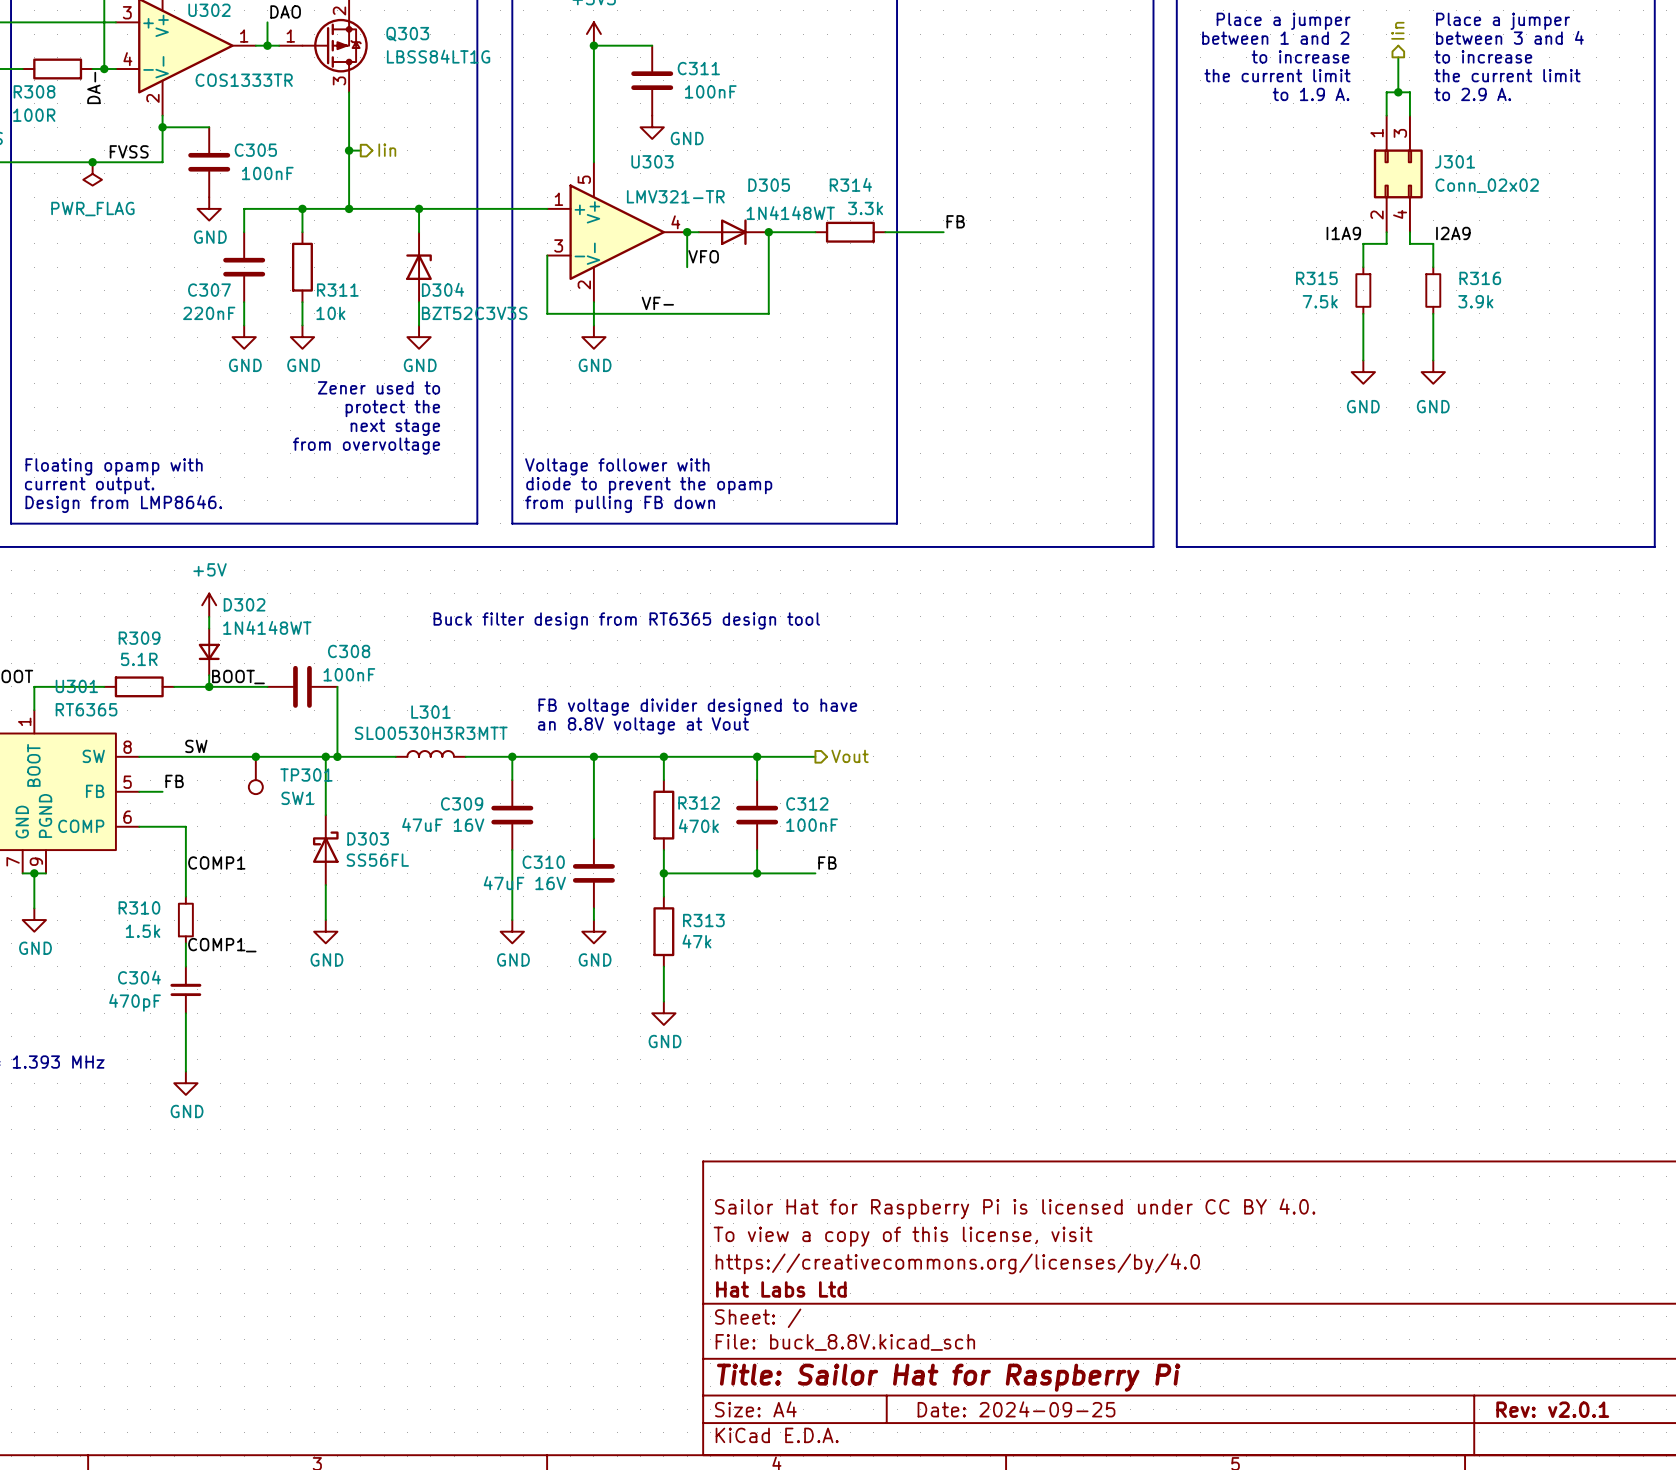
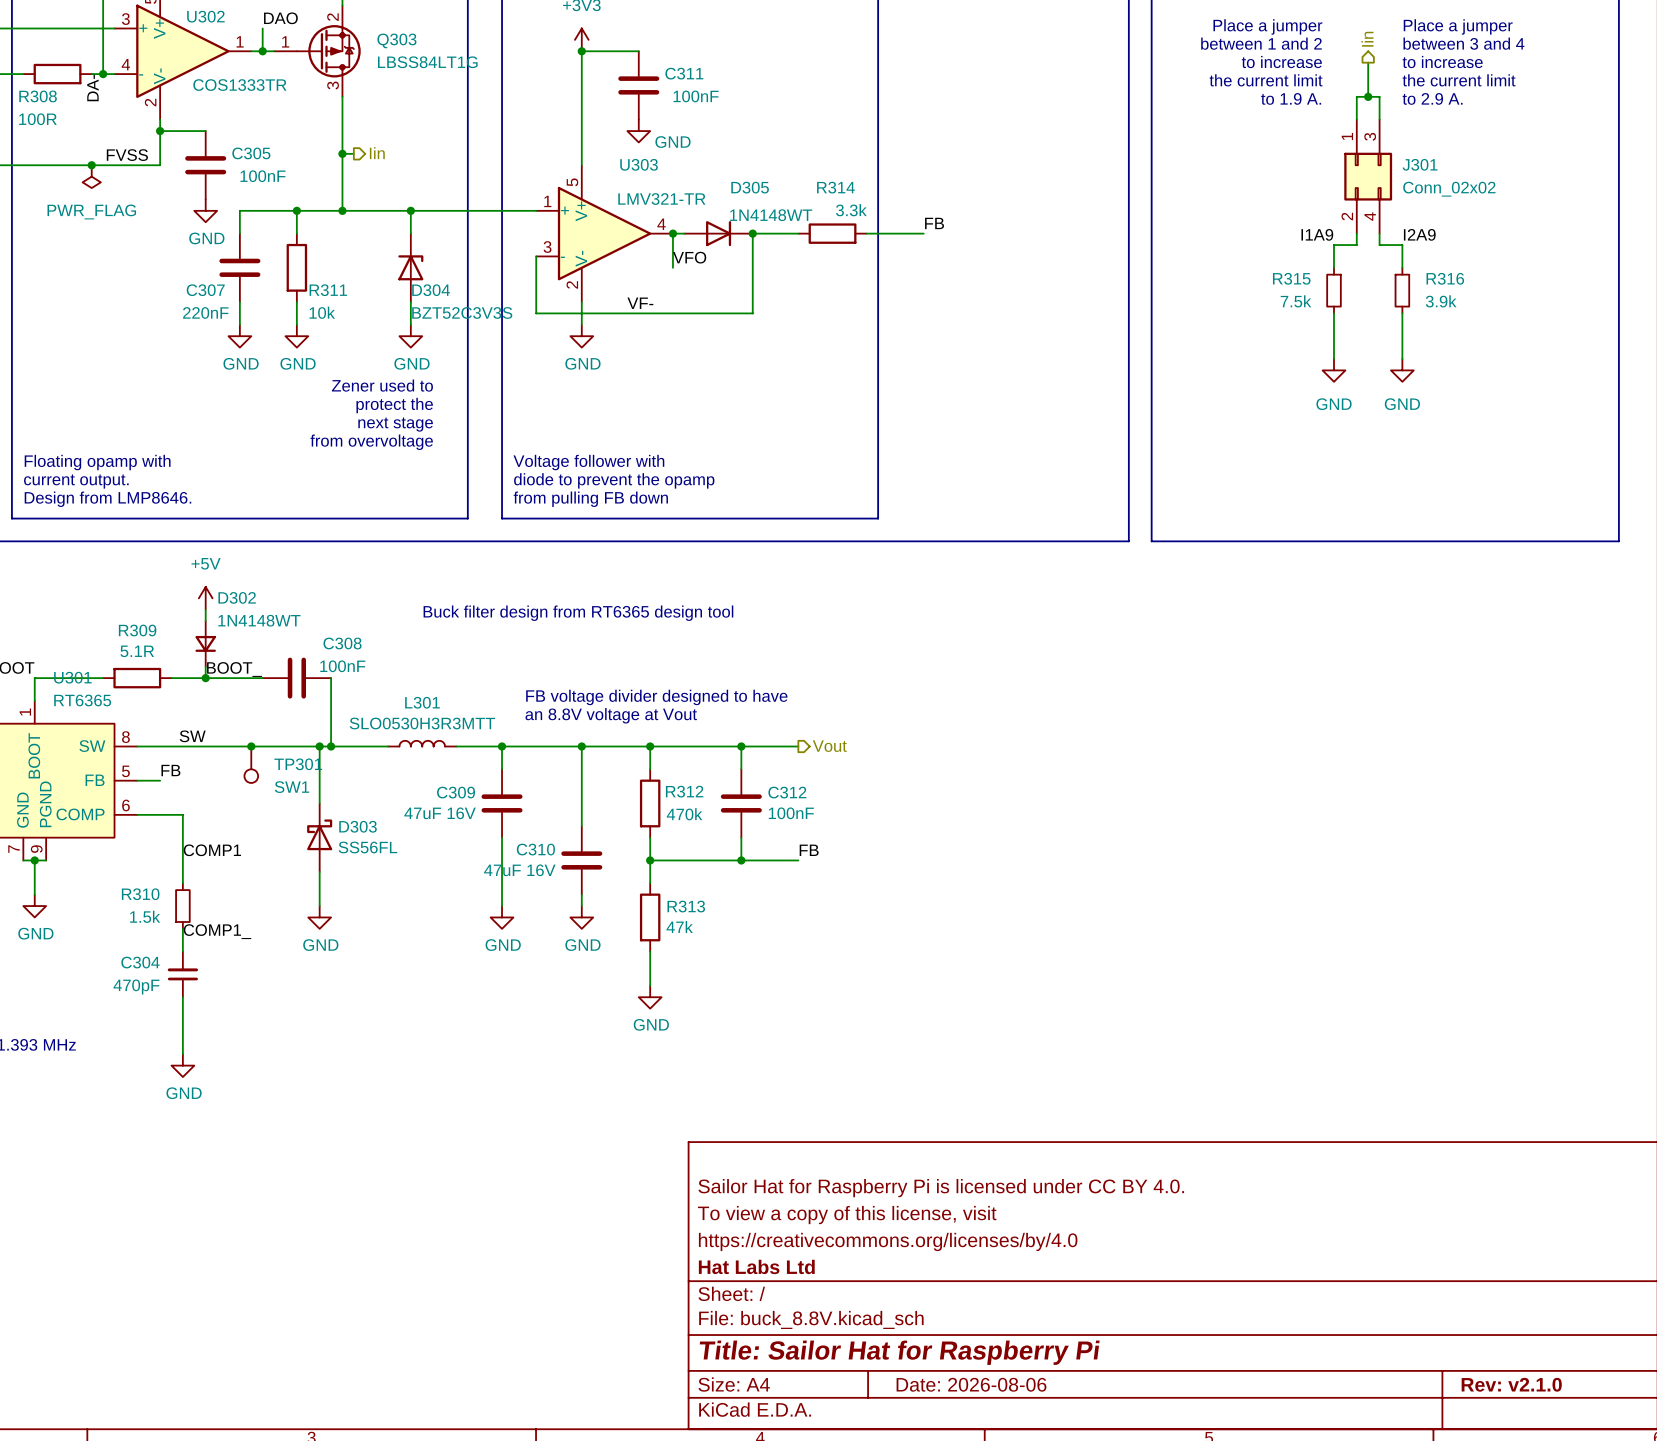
title block: Date: 2024-09-25 (1016, 1409) -> Date: 2026-08-06 (971, 1384)
title block: Rev: v2.0.1 (1552, 1409) -> Rev: v2.1.0 (1511, 1384)

